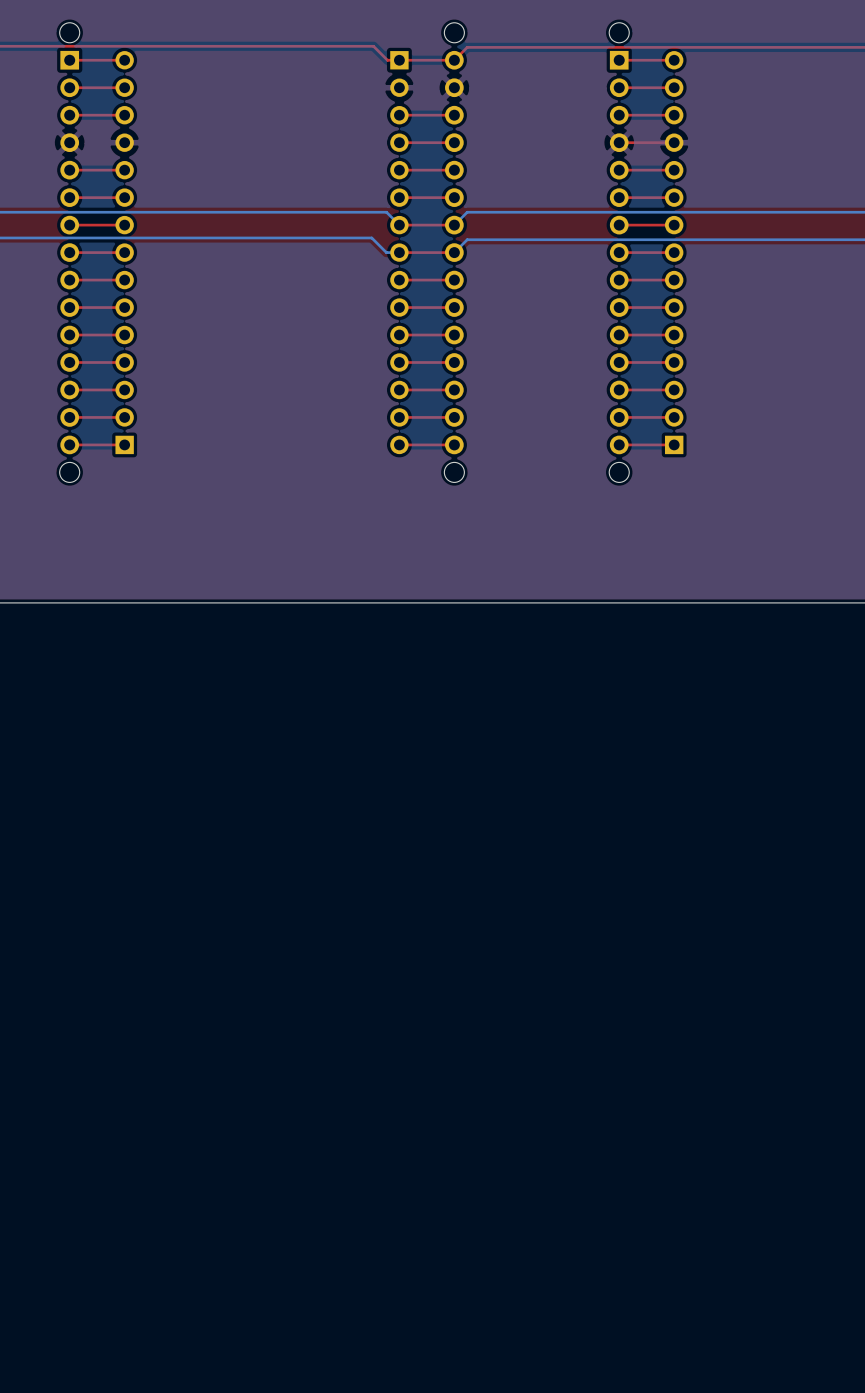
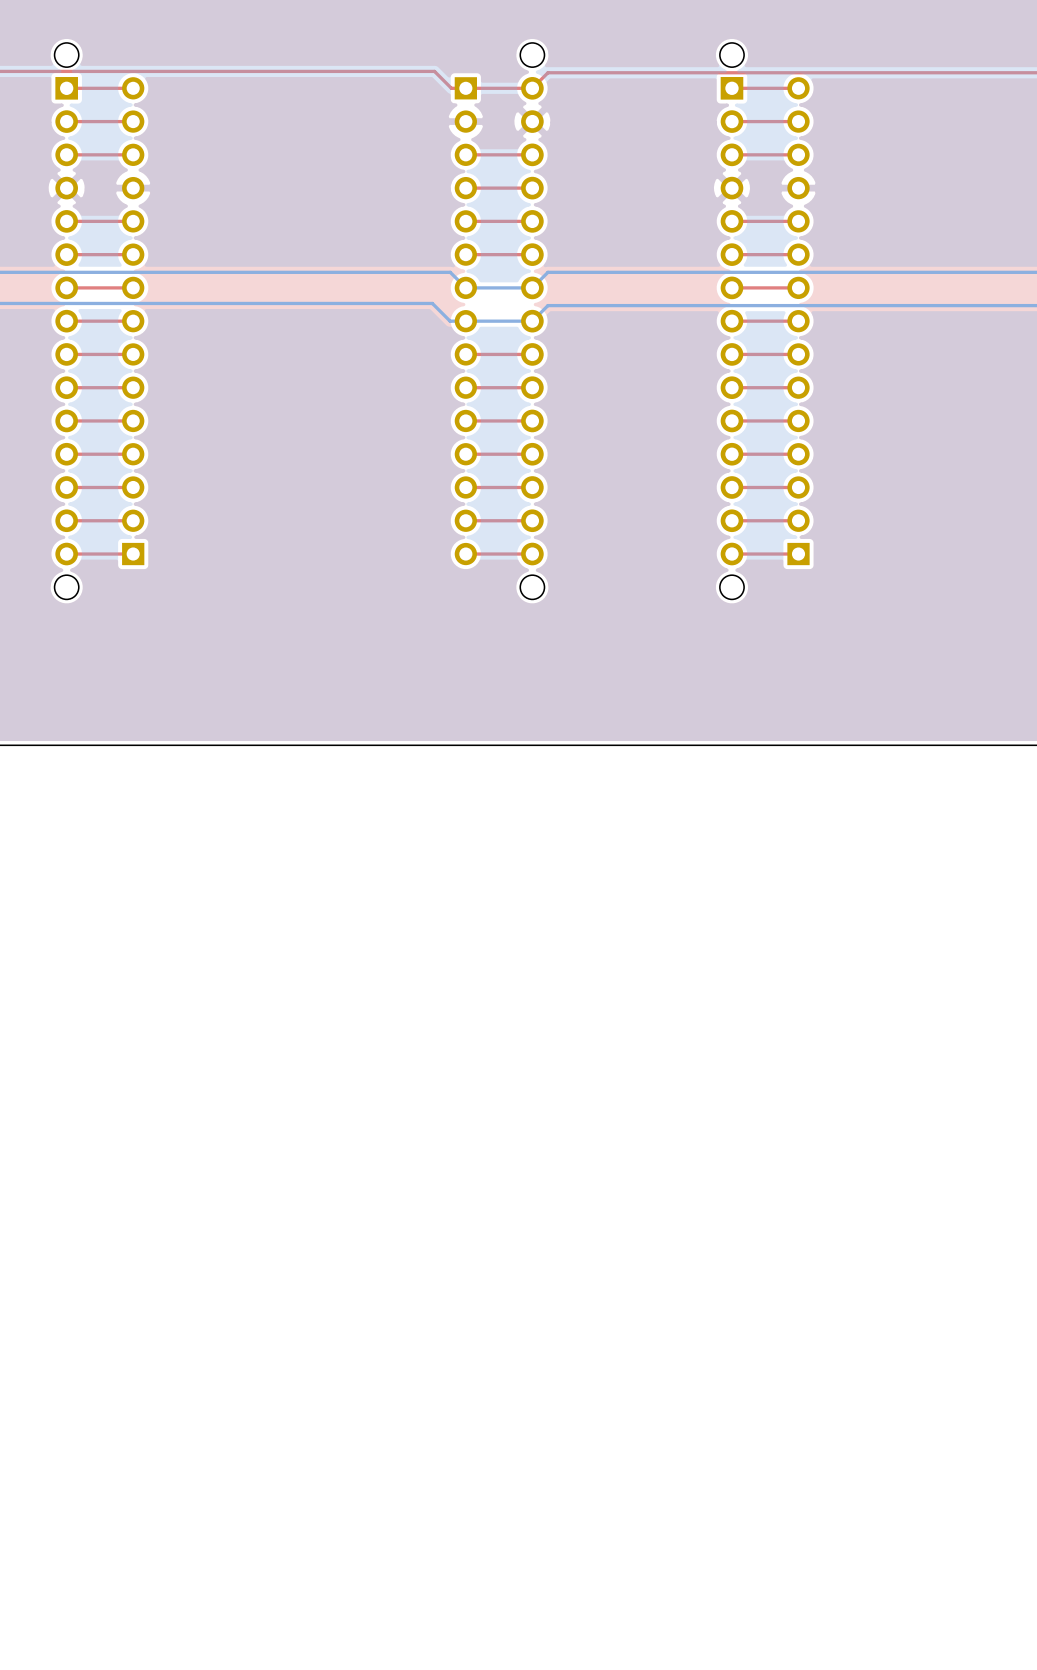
top track: (674, 142) (619, 142) -> none
top track: (454, 225) (399, 225) -> none
bottom track: none -> (532, 287) (465, 287)
top track: (454, 252) (399, 252) -> none
bottom track: none -> (532, 321) (465, 321)

